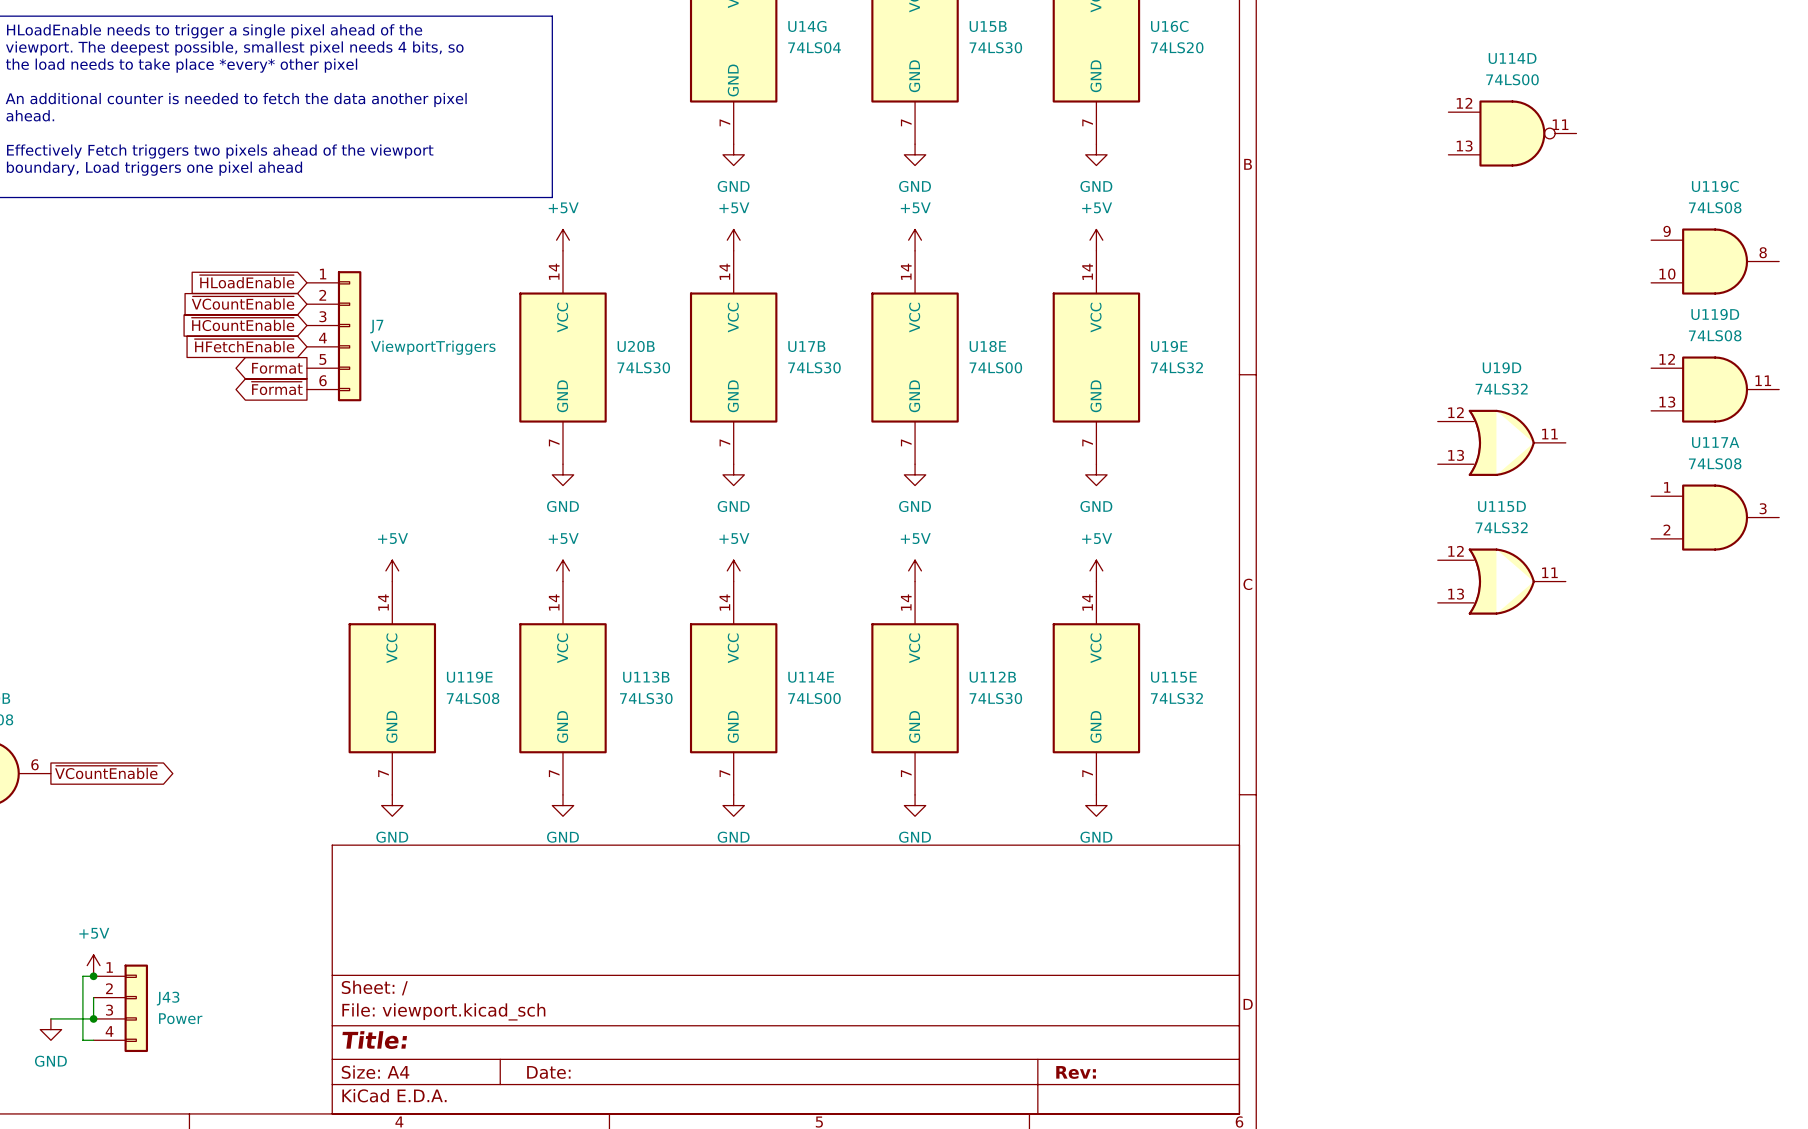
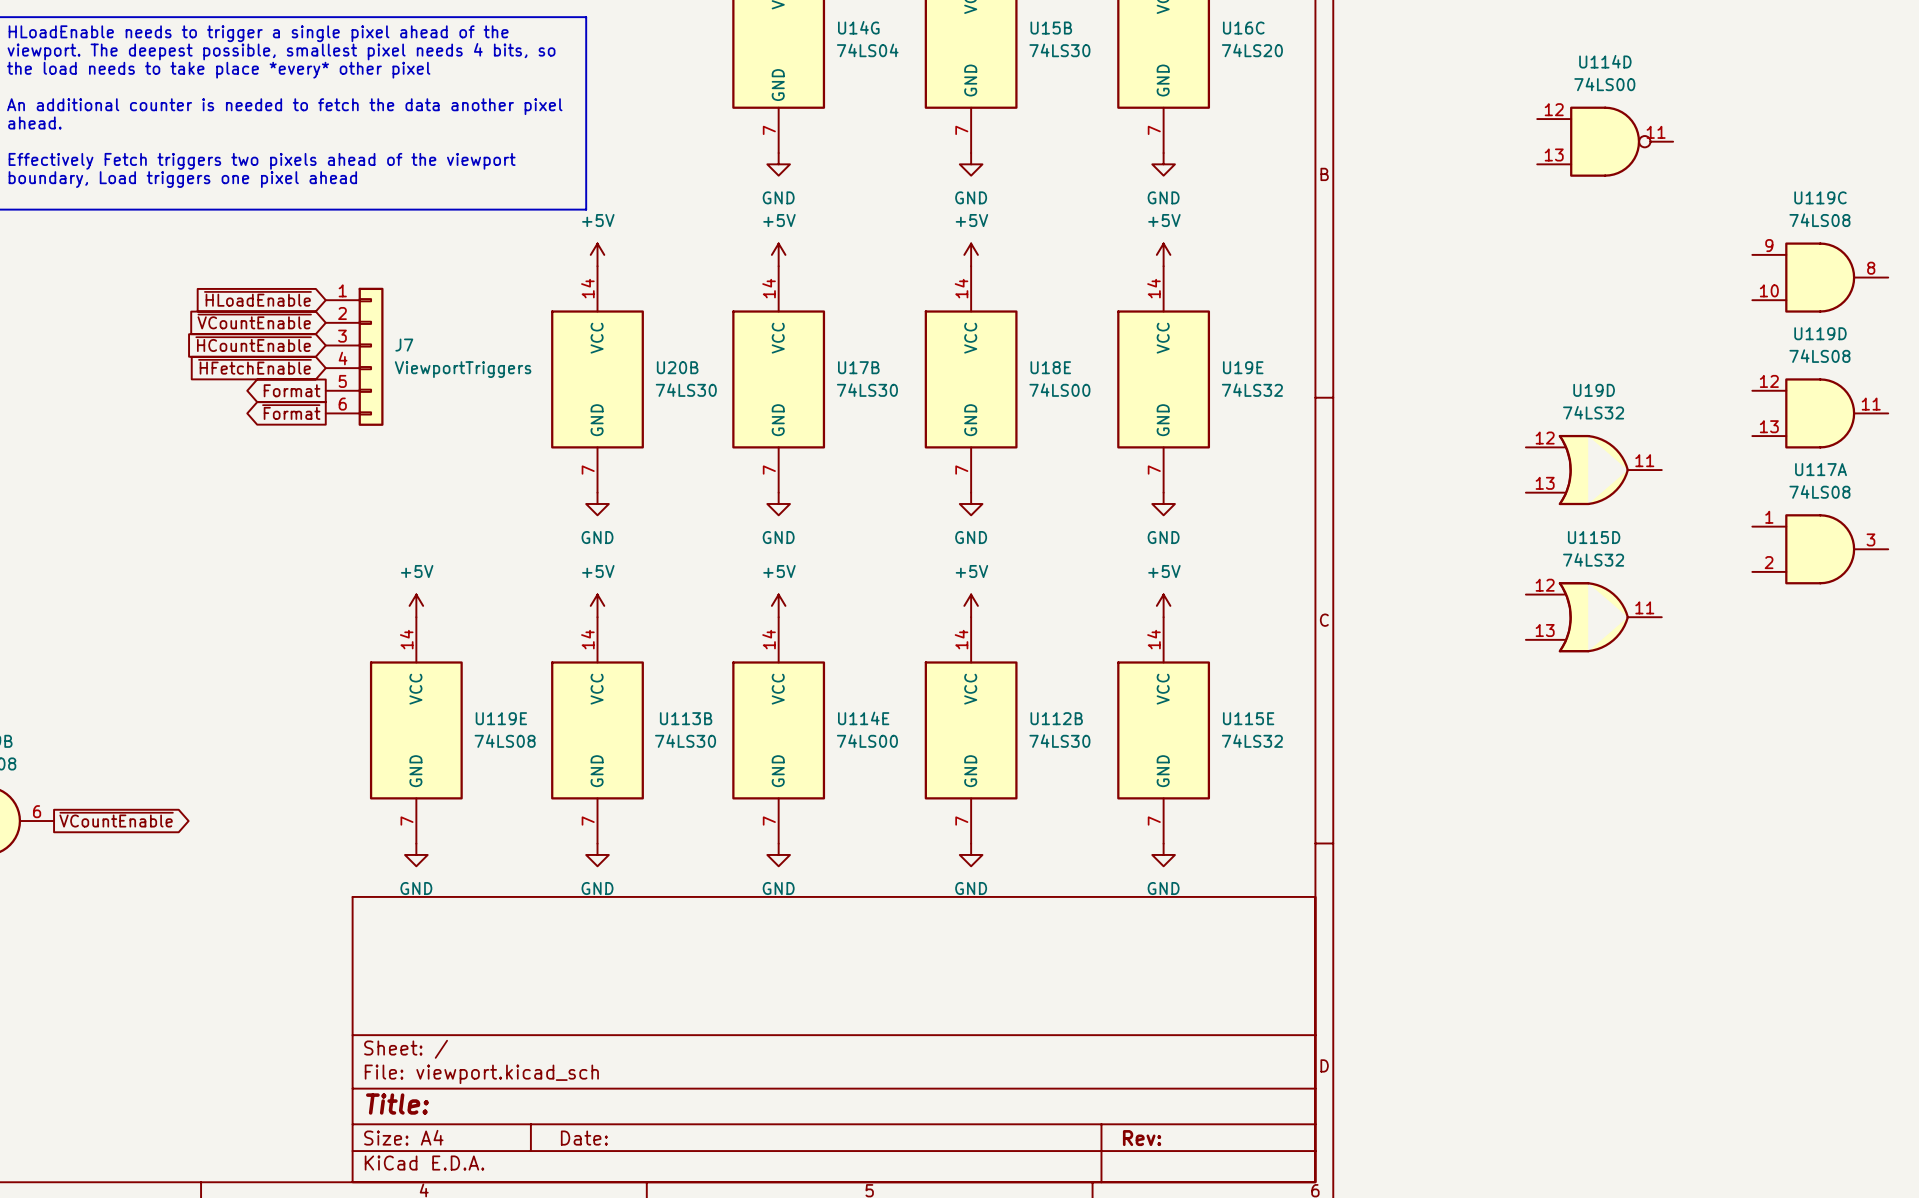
power symbol: +5V (93, 965) -> none
wire: (93, 976) (82, 976) (82, 1040) (93, 1040) -> none
junction: (93, 976) -> none
wire: (93, 997) (93, 1018) (50, 1018) -> none
J43: Power (120, 1008) -> none
junction: (93, 1018) -> none
power symbol: GND (50, 1029) -> none

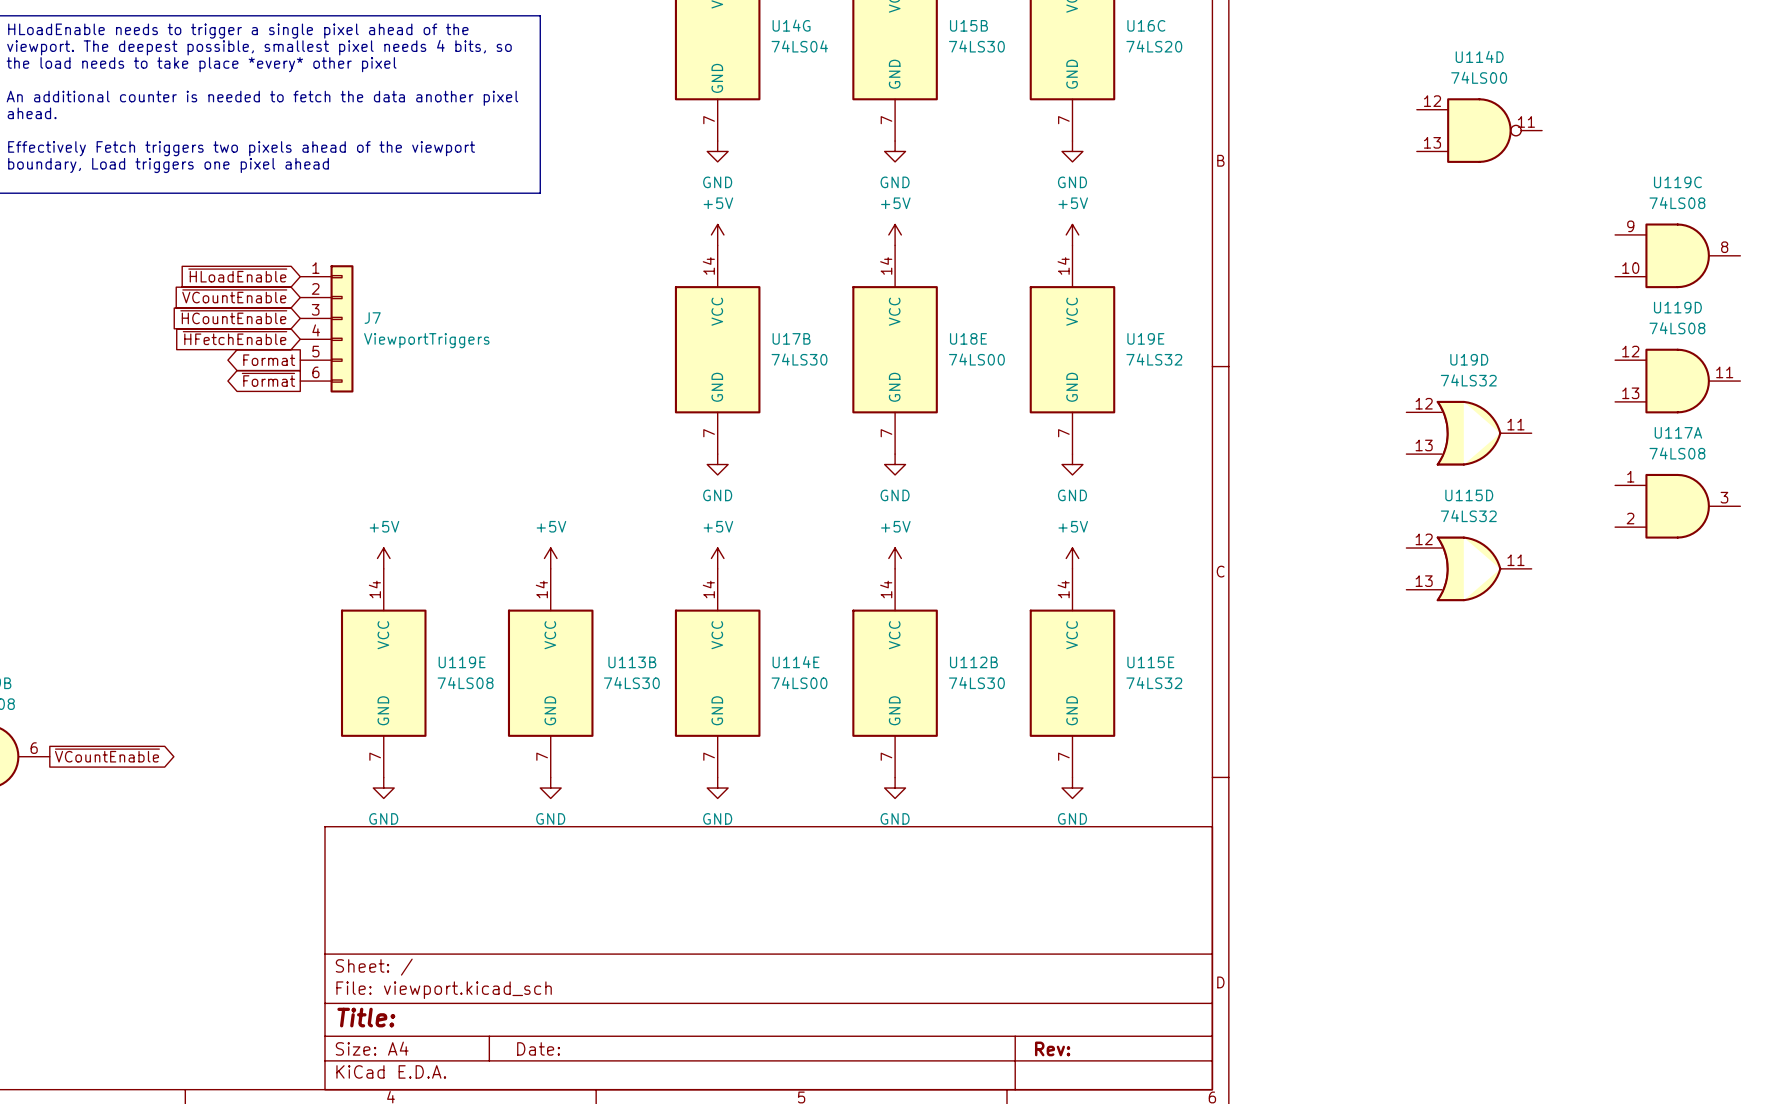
power symbol: +5V (597, 254) -> none
U20B: 74LS30 (597, 379) -> none
power symbol: GND (597, 503) -> none

